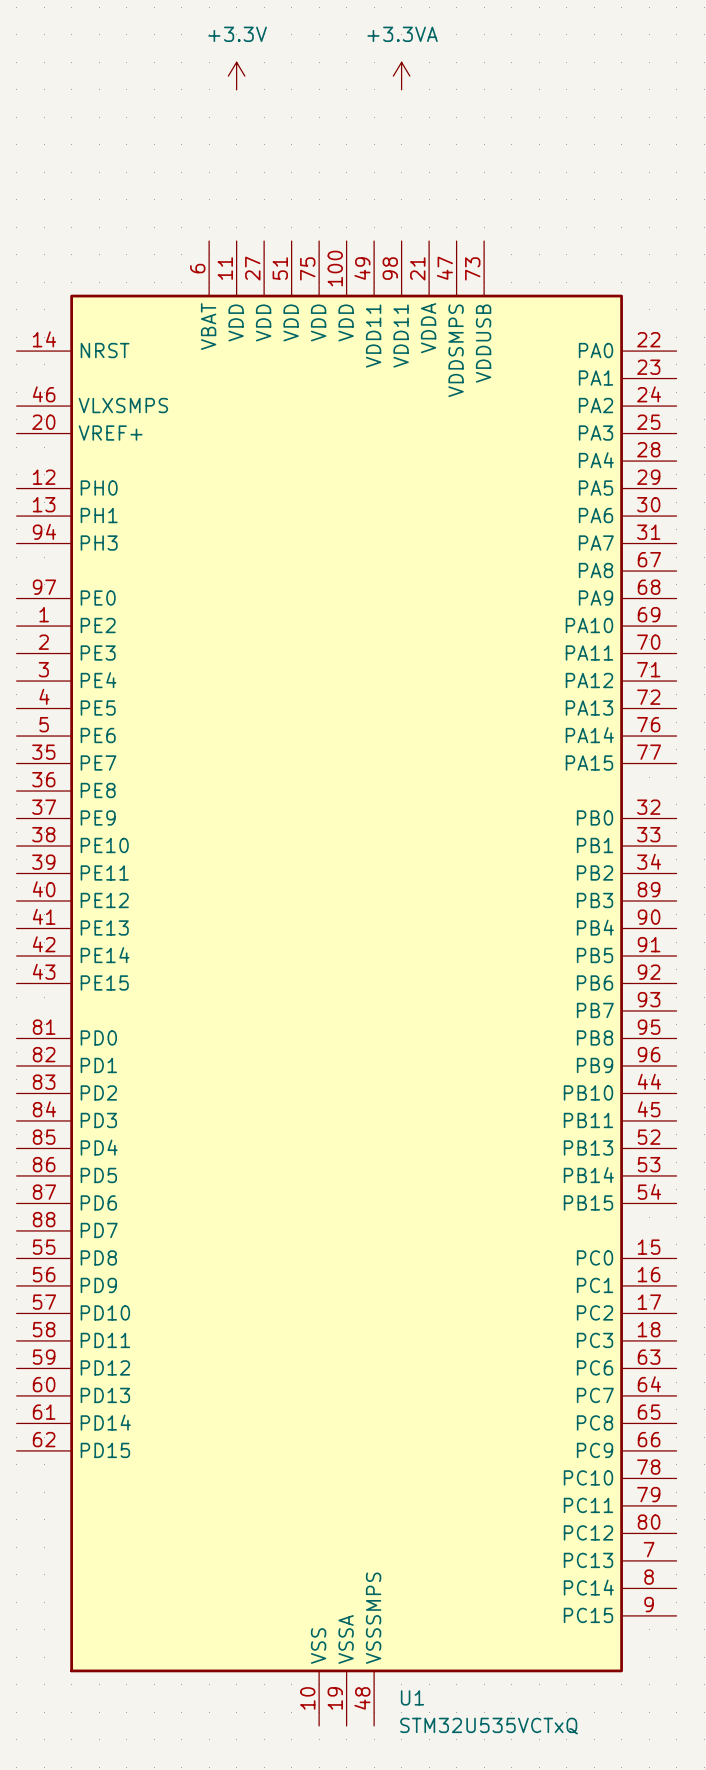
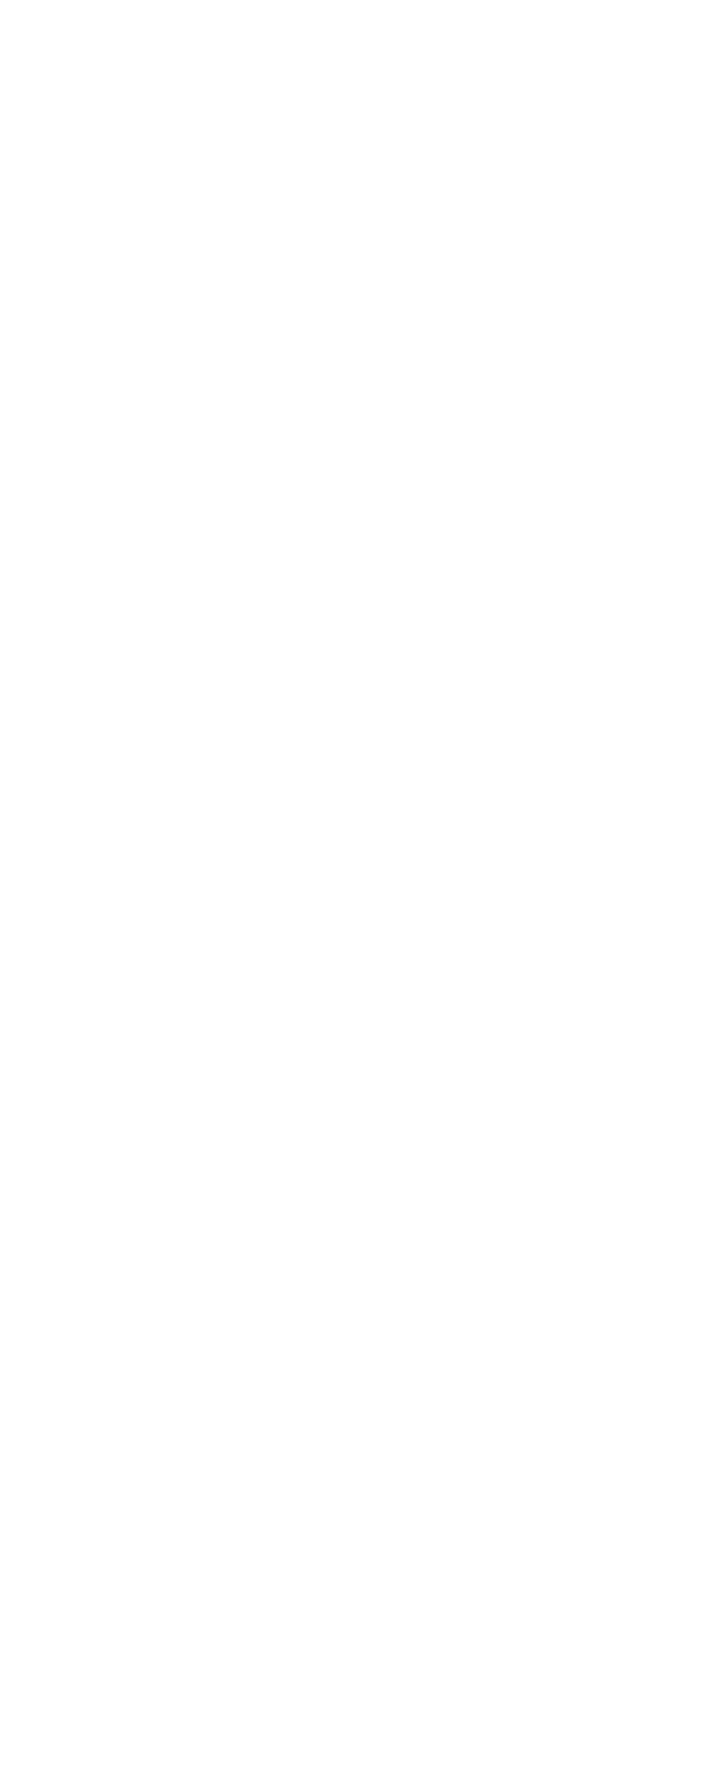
power symbol: +3.3V (236, 76) -> none
power symbol: +3.3VA (401, 76) -> none
U1: STM32U535VCTxQ (346, 983) -> none

